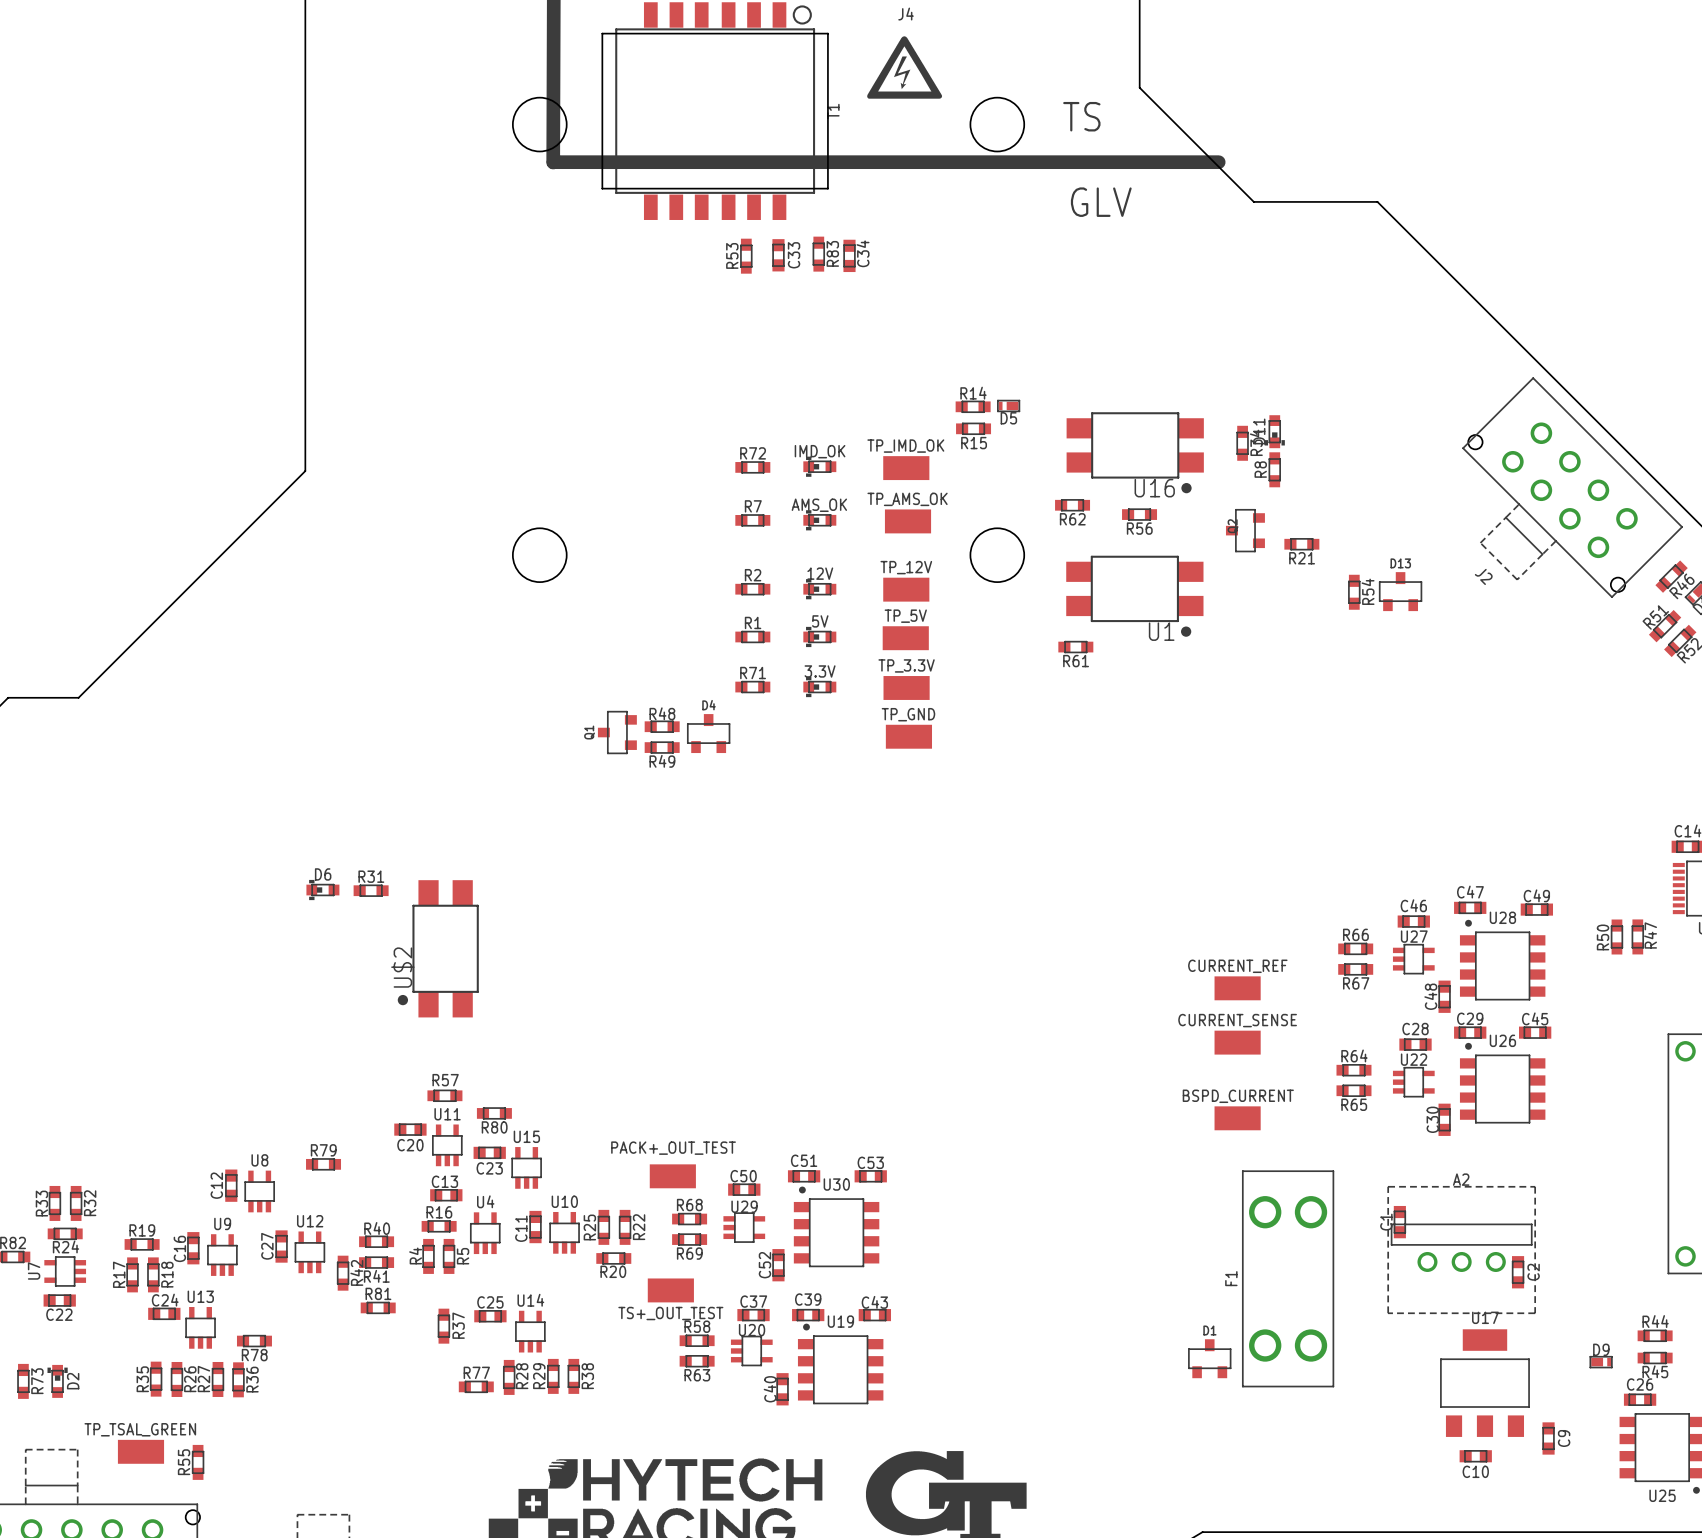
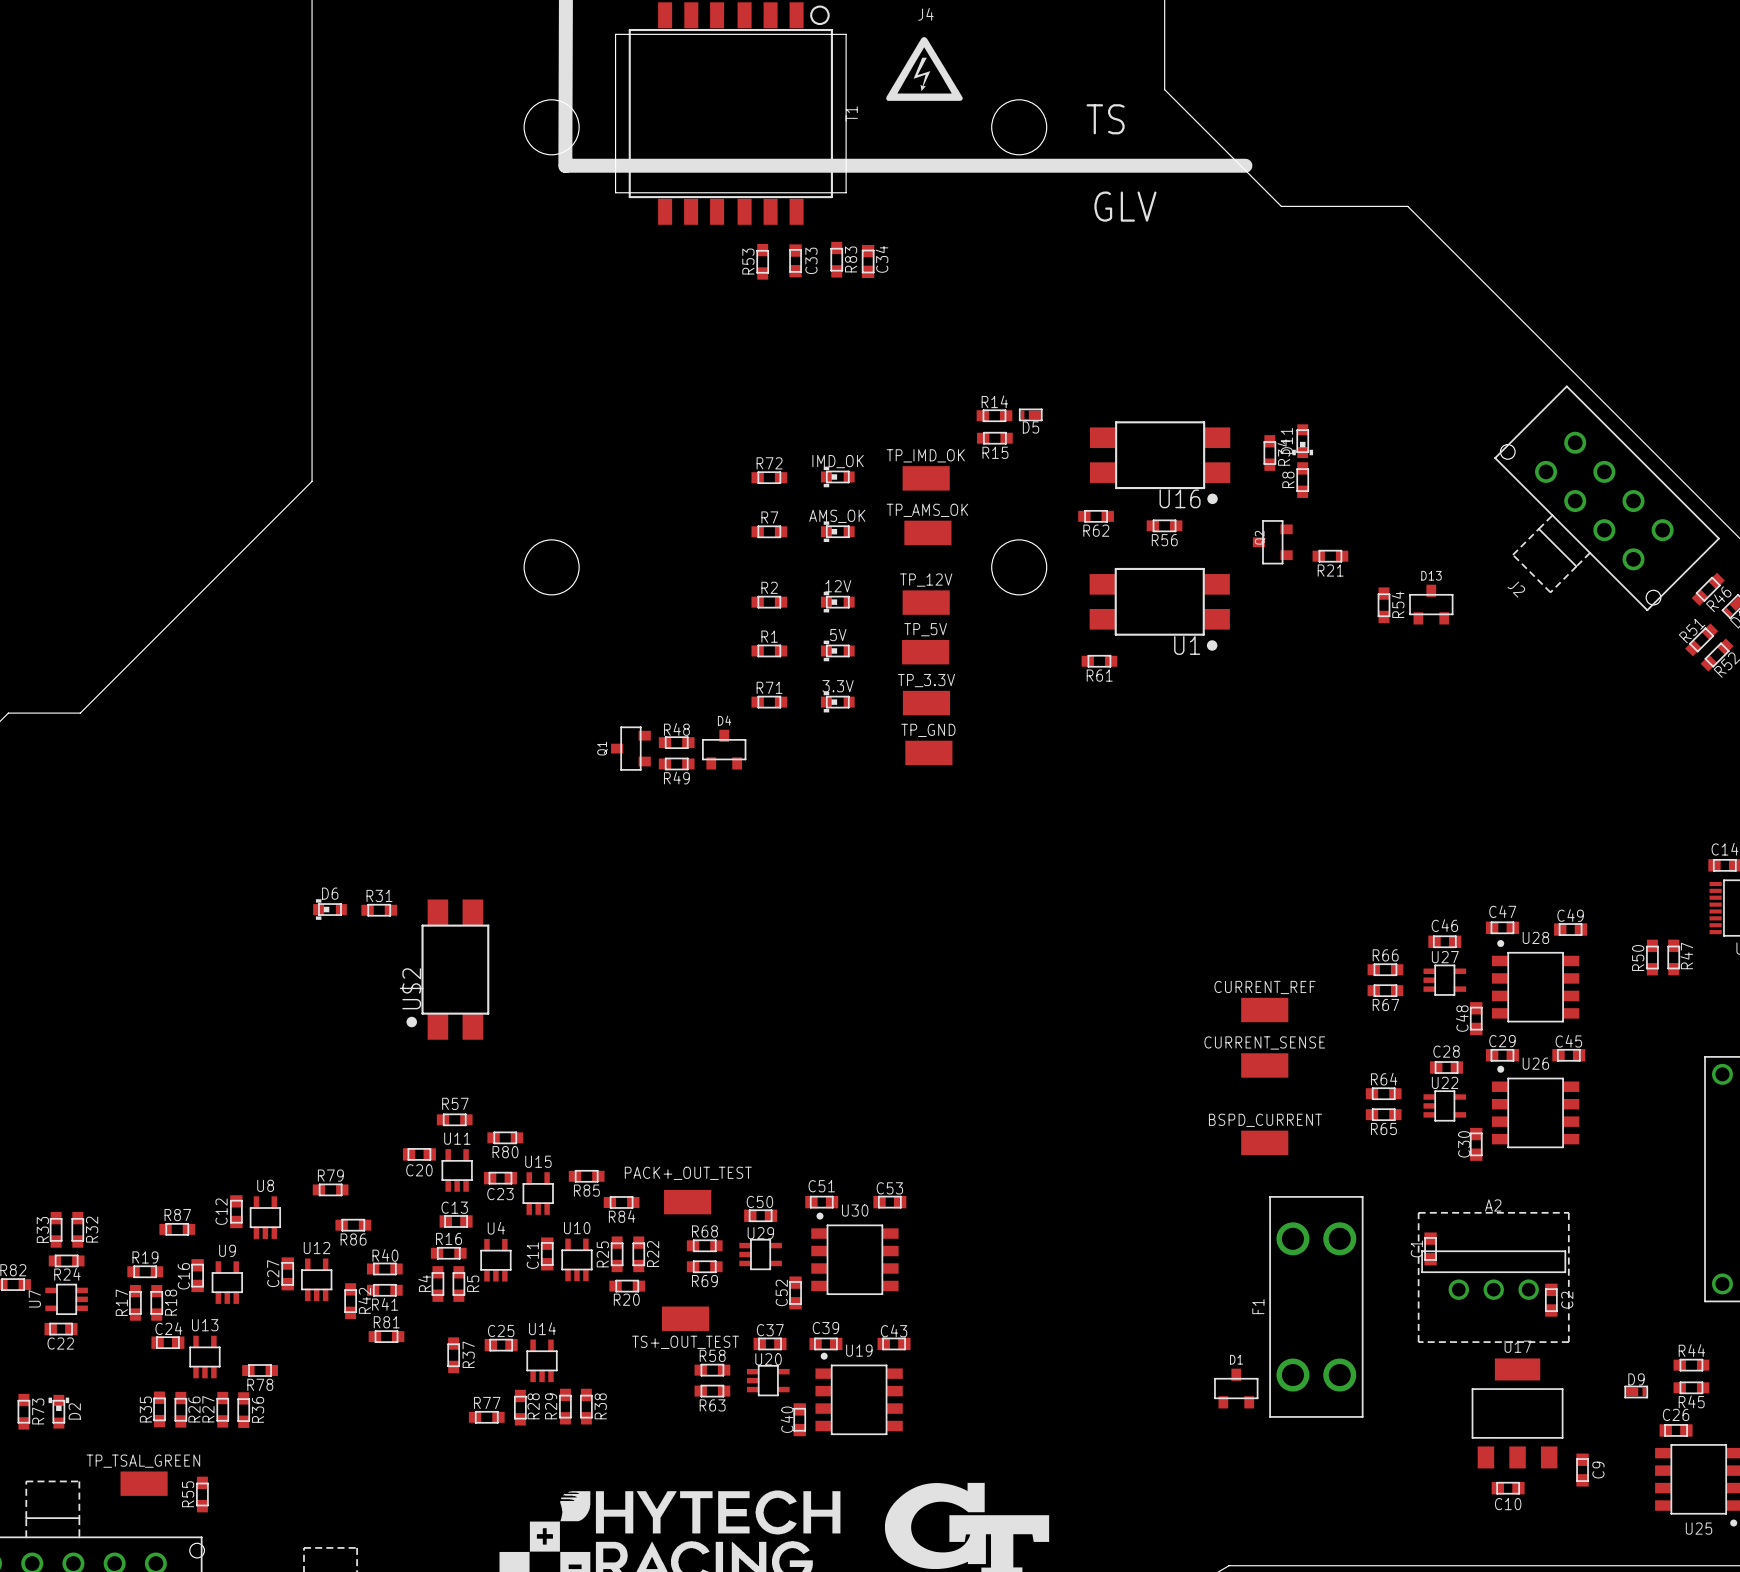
R85: none -> (586, 1176)
R84: none -> (621, 1202)
R86: none -> (353, 1225)
R87: none -> (177, 1229)

